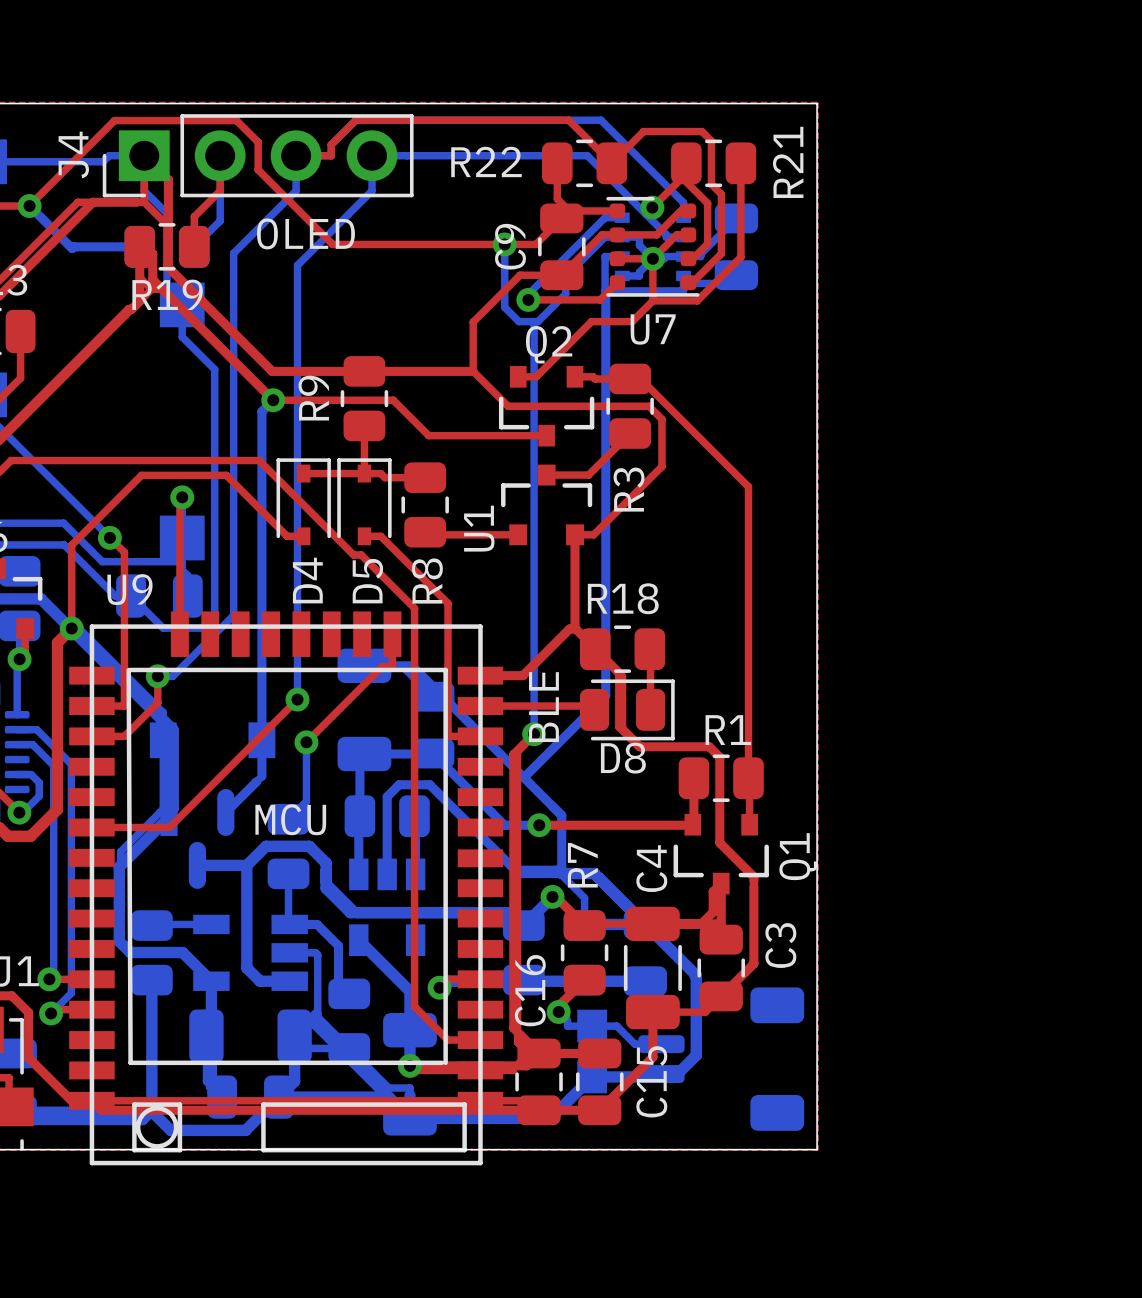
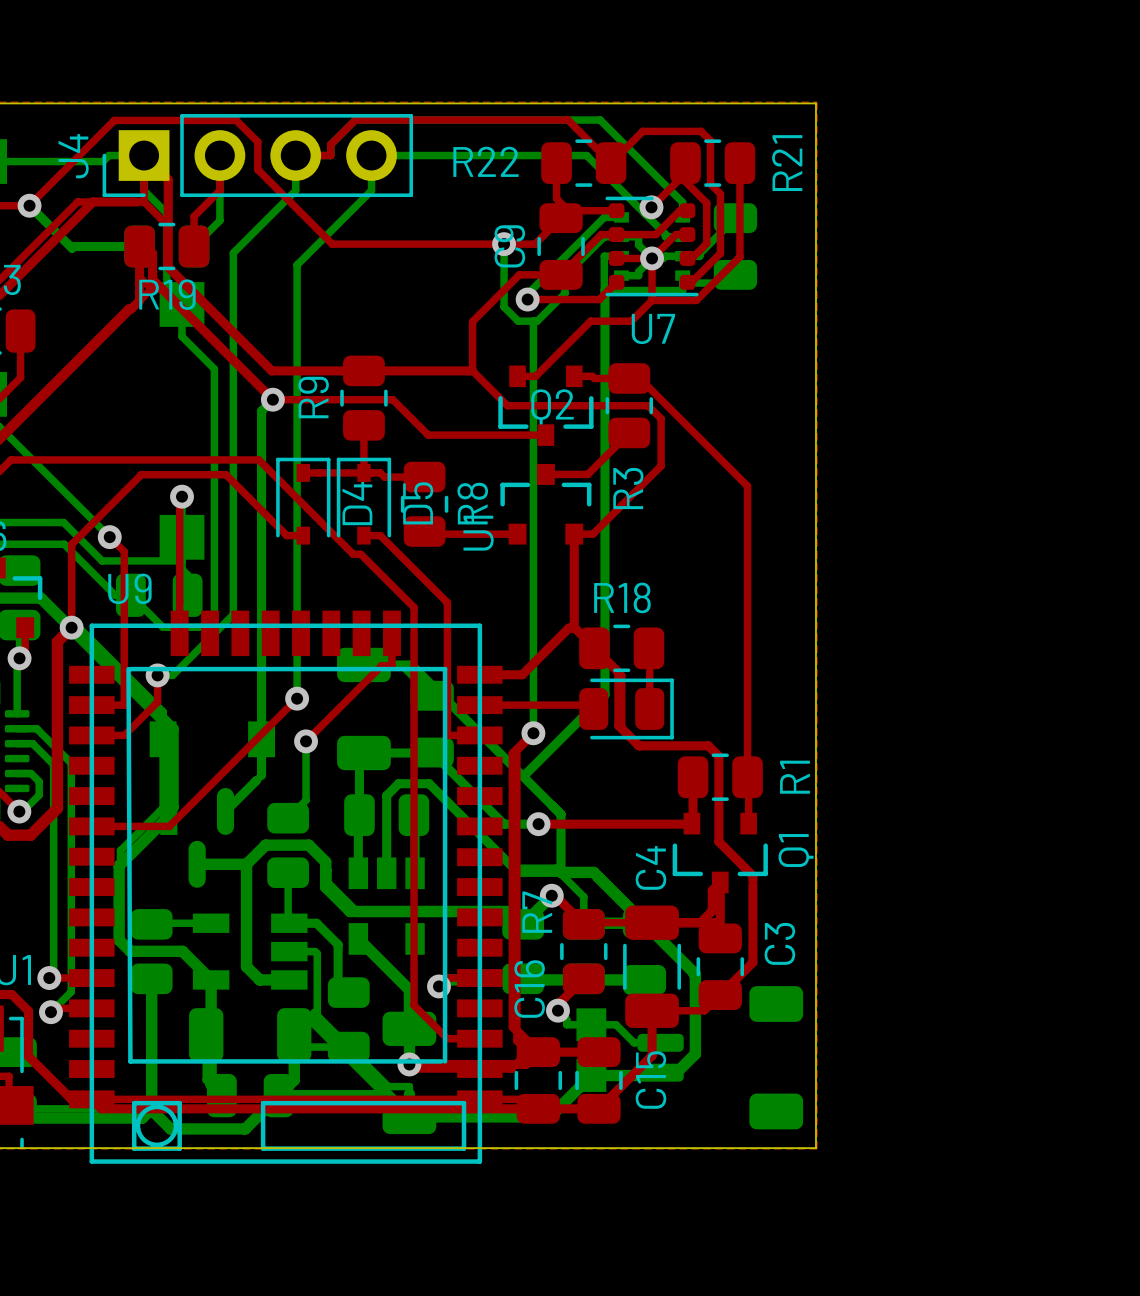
text: OLED (305, 233) -> none
Q2 name position: Q2 (549, 344) -> Q2 (552, 406)
D4 name position: D4 (307, 580) -> D4 (357, 503)
D5 name position: D5 (367, 581) -> D5 (418, 503)
R8 name position: R8 (427, 581) -> R8 (472, 503)
text: BLE (543, 707) -> none
R1 name rotation: 0° (728, 730) -> 90° counterclockwise (794, 777)
R1 name position: R1 (728, 730) -> R1 (794, 777)
D8 name: D8 (623, 758) -> none
text: MCU (290, 819) -> none
R7 name position: R7 (582, 865) -> R7 (537, 912)

